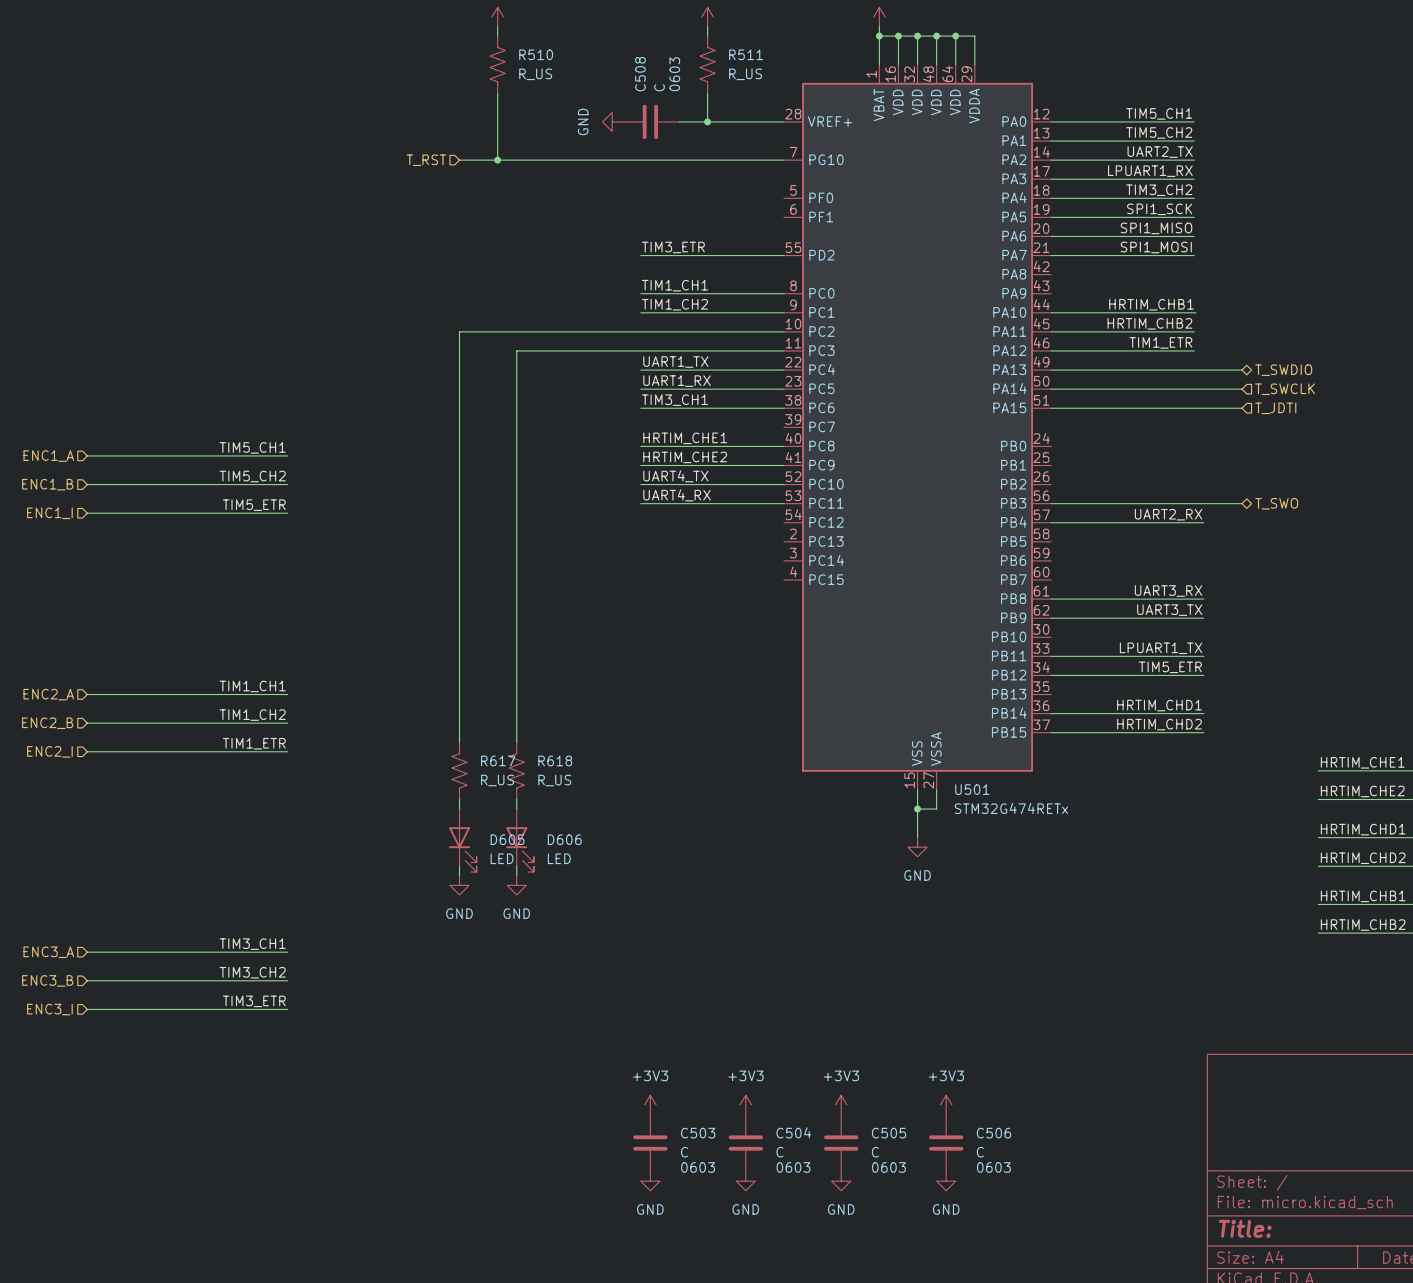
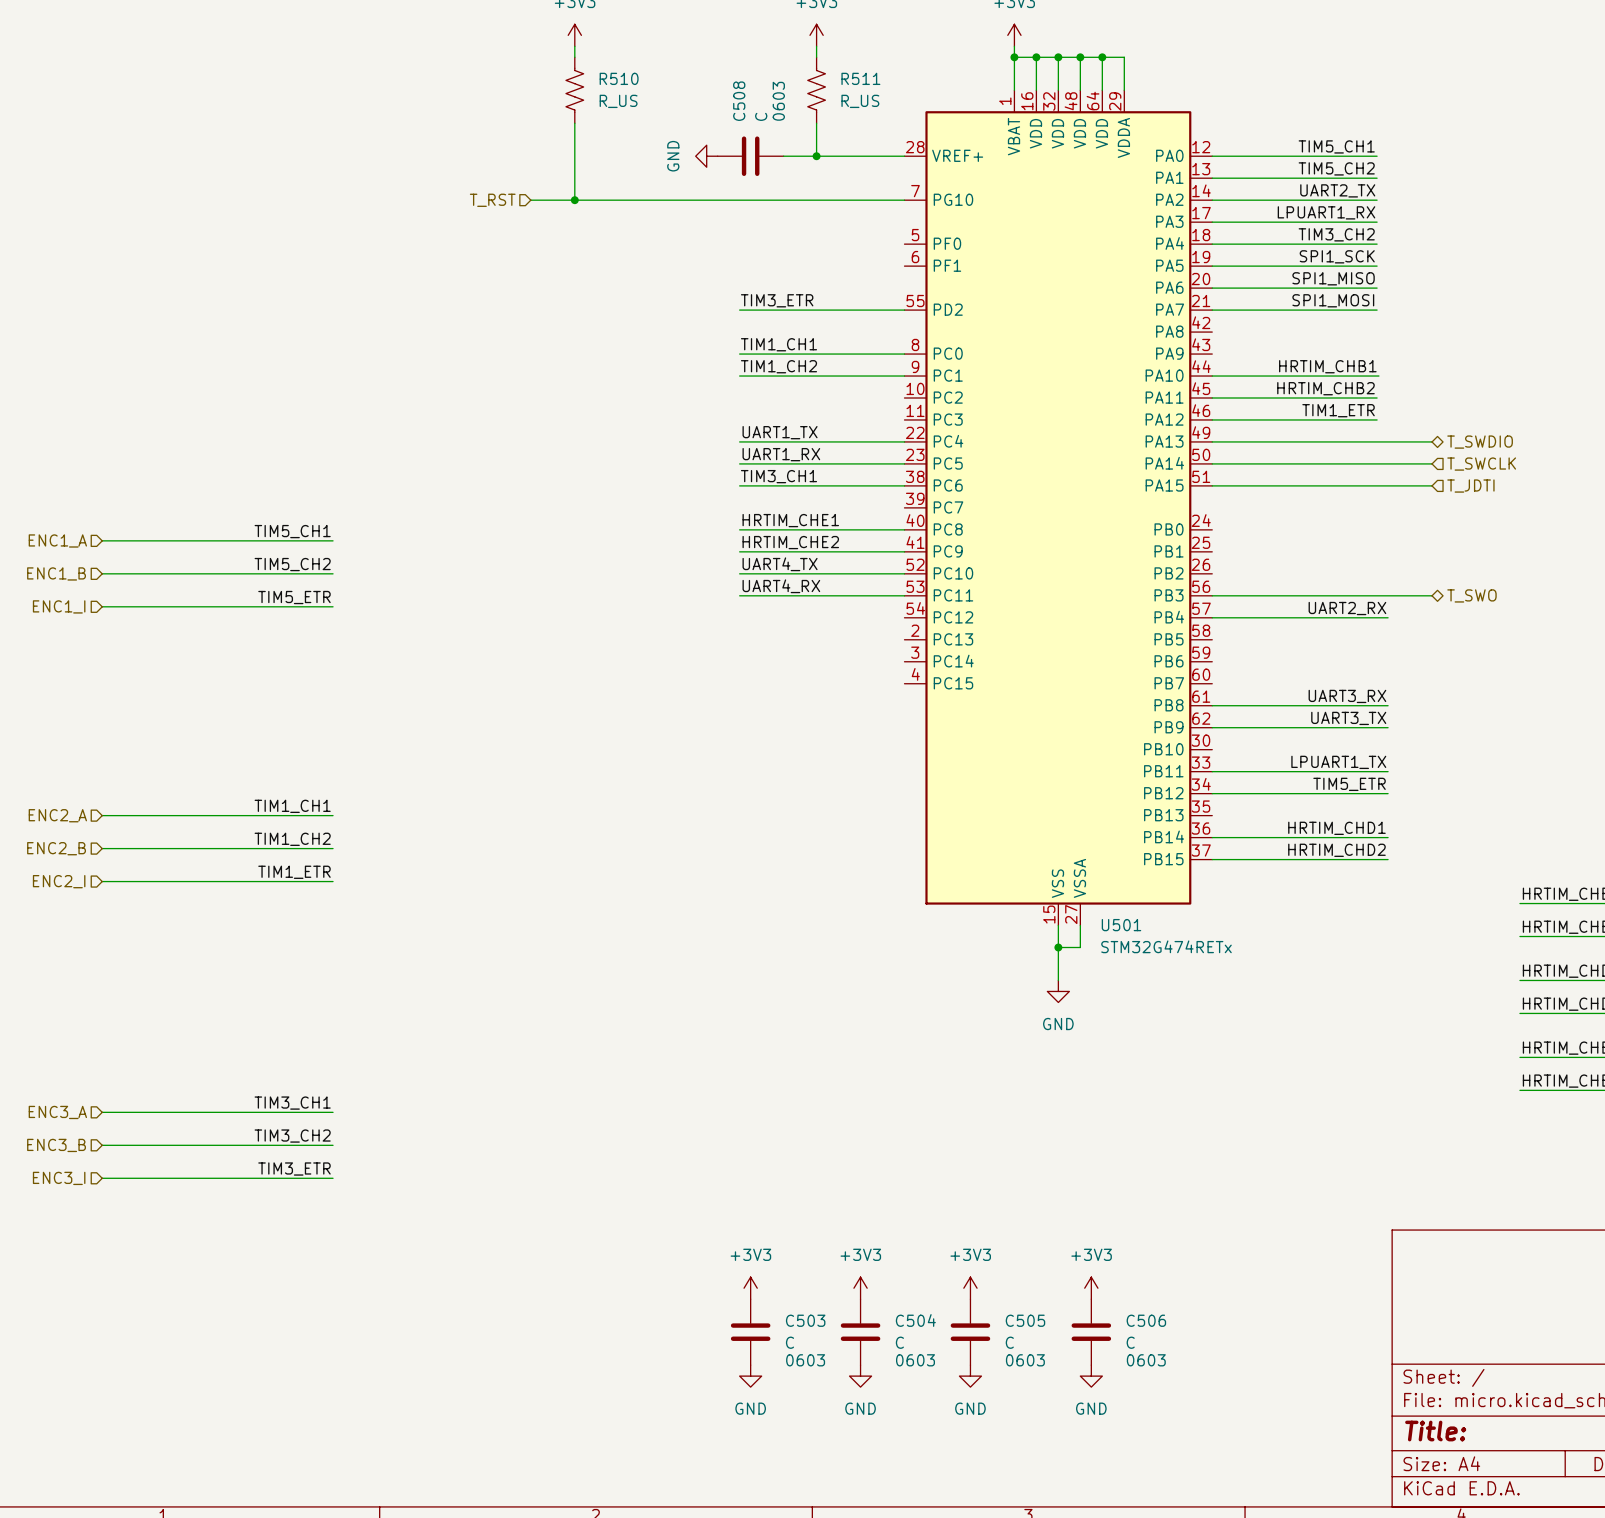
wire: (783, 331) (459, 331) (459, 742) -> none
wire: (783, 350) (516, 350) (516, 742) -> none
R617: R_US (459, 770) -> none
R618: R_US (516, 770) -> none
wire: (459, 799) (459, 809) -> none
wire: (516, 799) (516, 809) -> none
D605: LED (462, 840) -> none
D606: LED (520, 840) -> none
wire: (459, 866) (459, 875) -> none
wire: (516, 866) (516, 875) -> none
power symbol: GND (459, 885) -> none
power symbol: GND (516, 885) -> none

